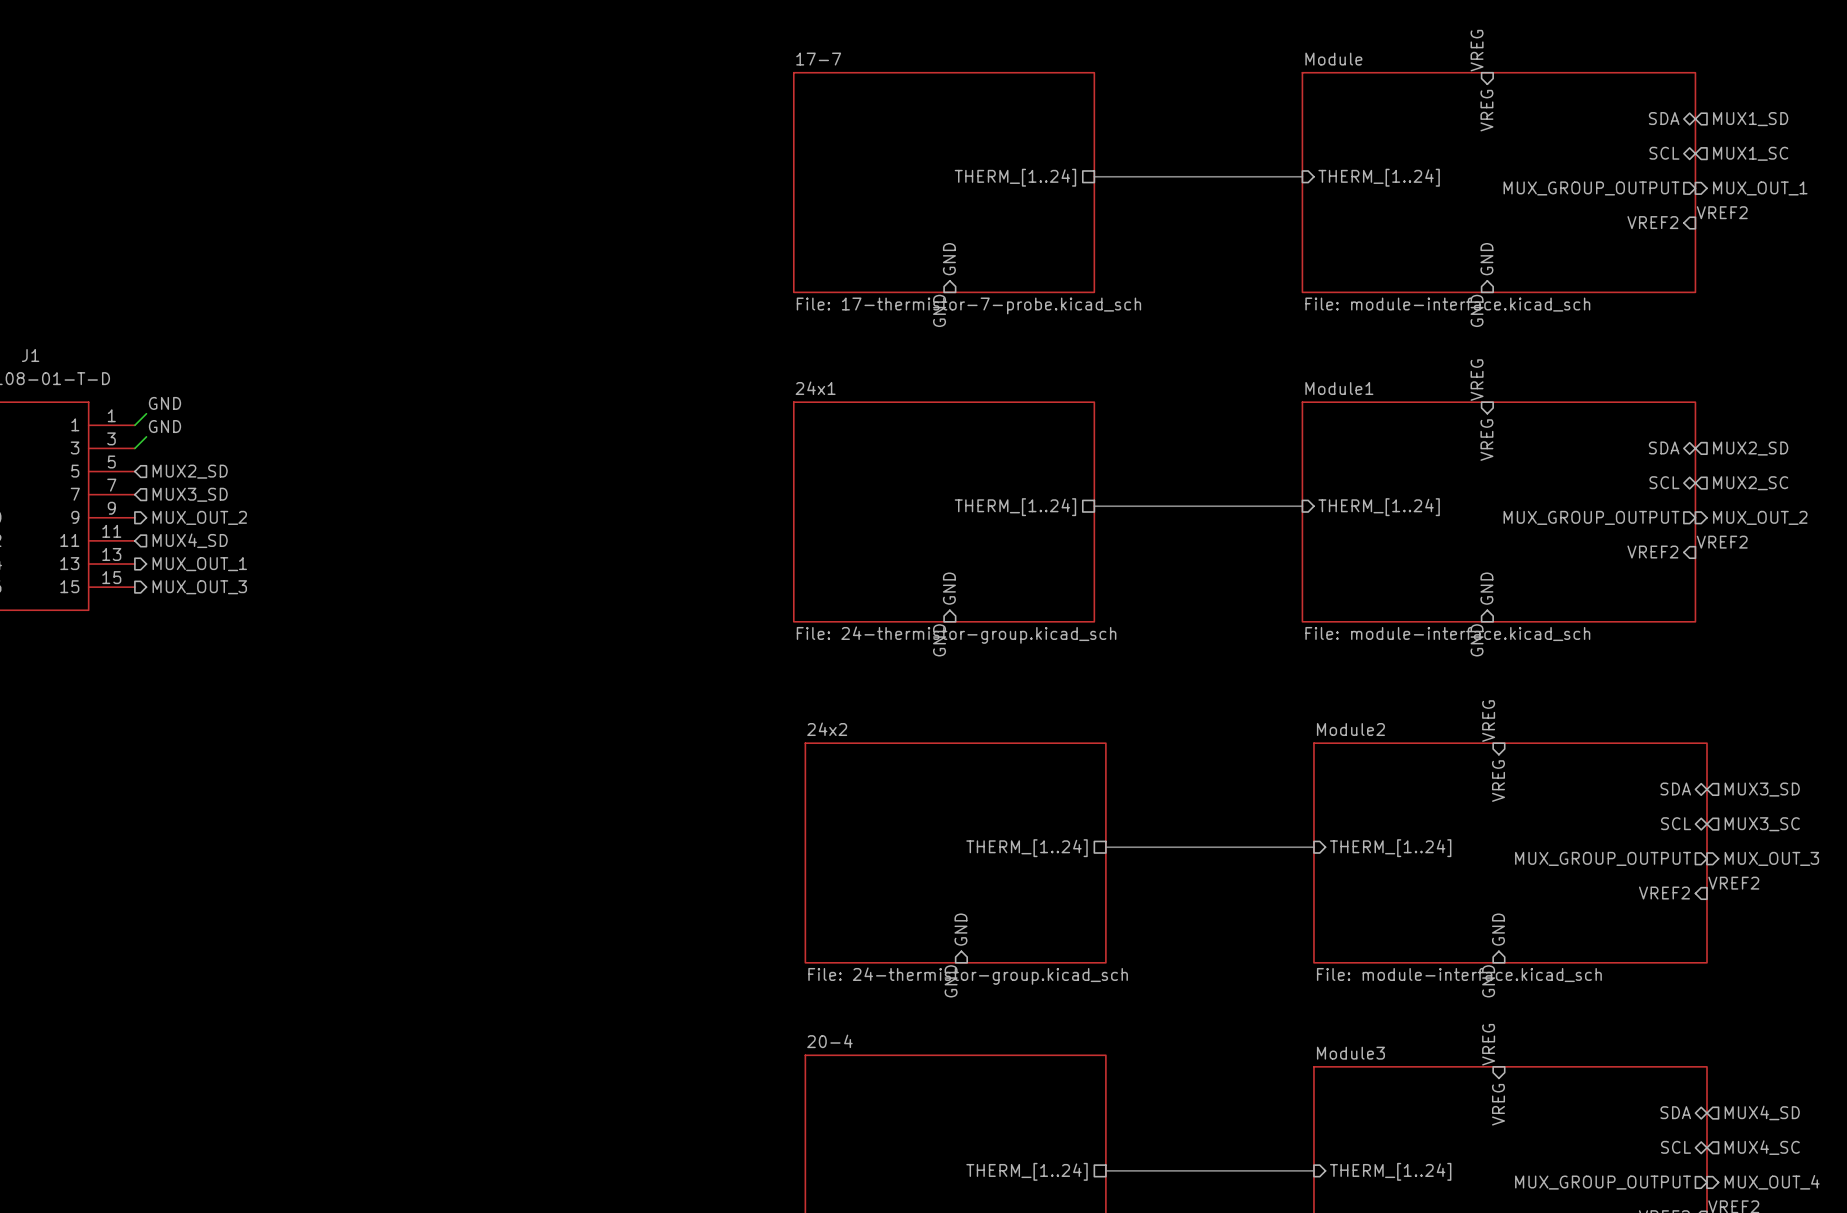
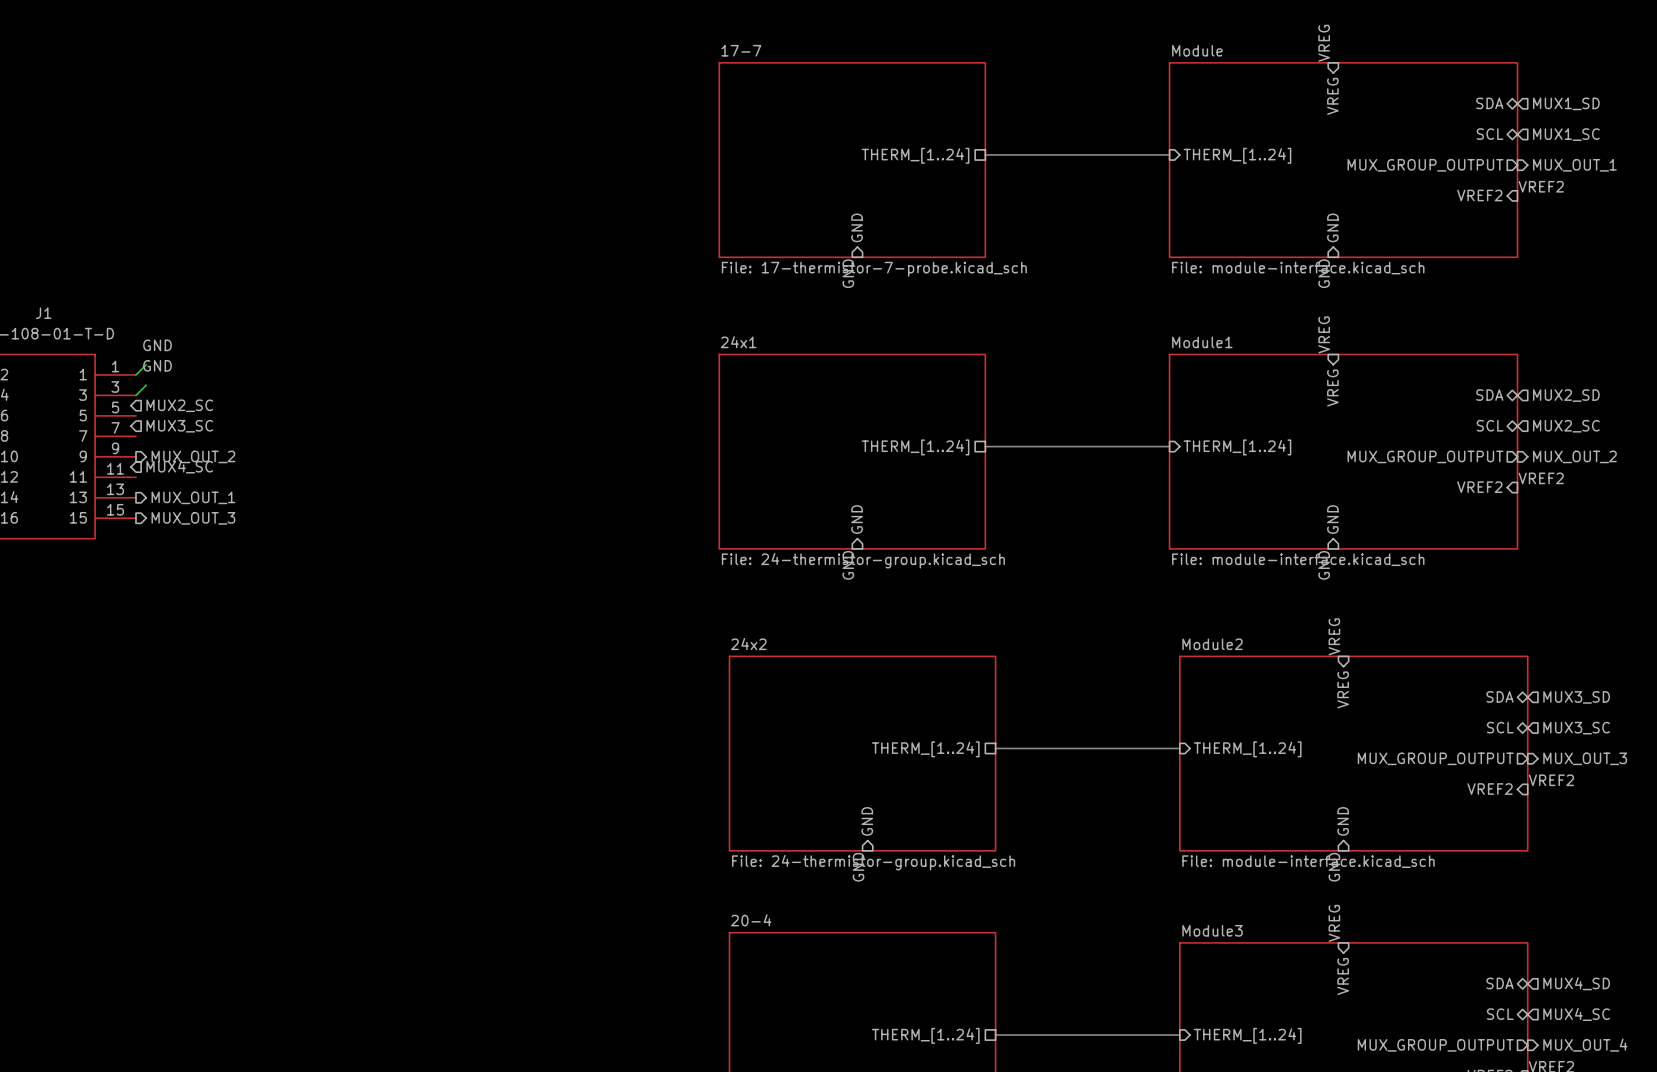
label: none -> GND (157, 345)
label: GND (164, 403) -> none
label: none -> GND (157, 365)
label: GND (164, 426) -> none
hierarchical label: none -> MUX2_SC (179, 405)
hierarchical label: MUX2_SD (190, 471) -> none
hierarchical label: none -> MUX3_SC (179, 426)
hierarchical label: MUX3_SD (190, 494) -> none
hierarchical label: MUX4_SD (190, 540) -> MUX4_SC (179, 466)

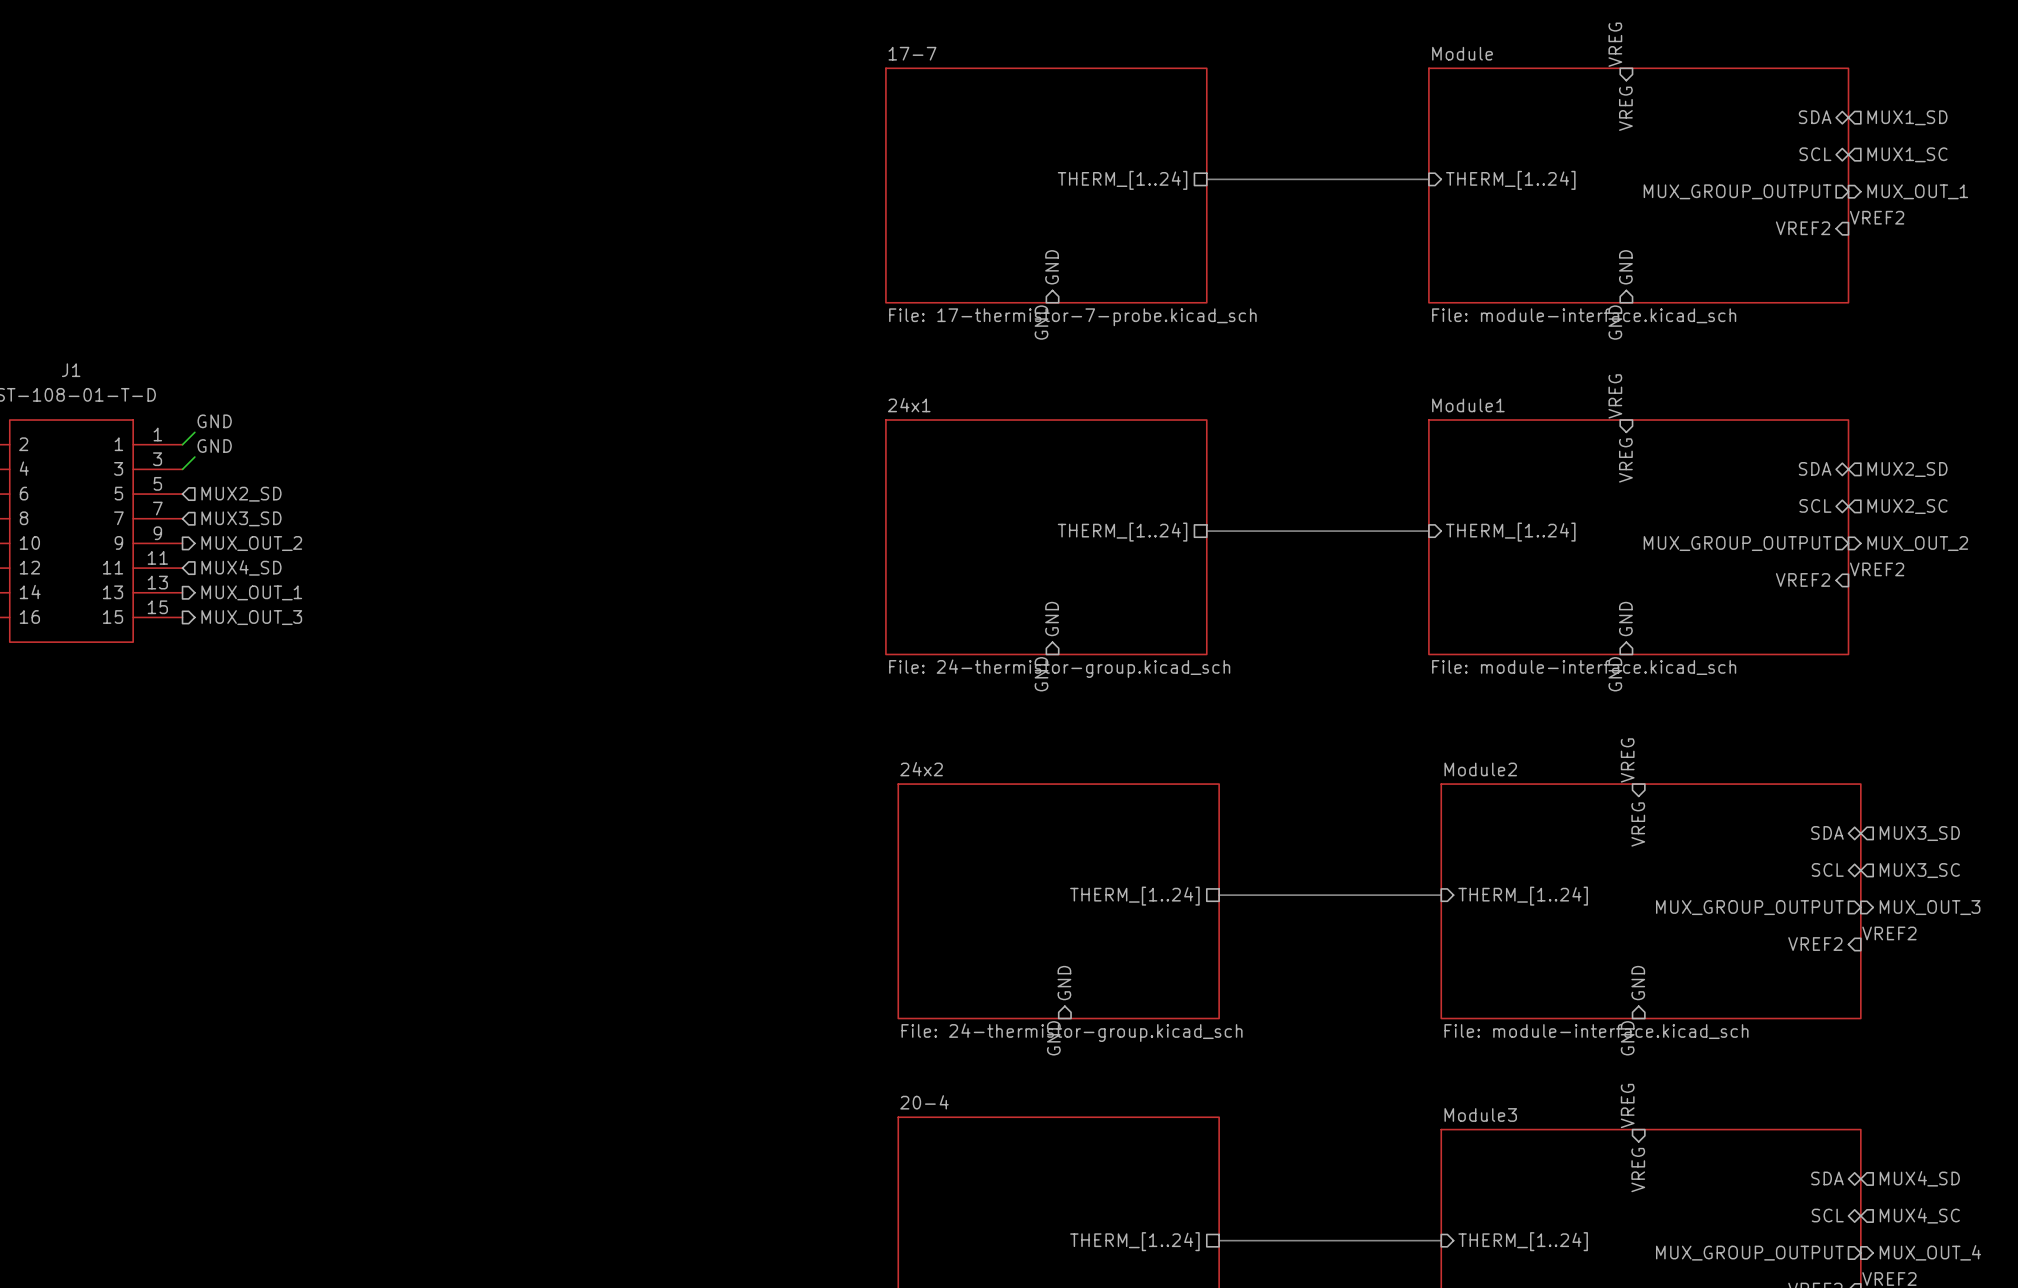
label: GND (157, 345) -> none
label: none -> GND (214, 421)
label: GND (157, 365) -> none
label: none -> GND (214, 446)
hierarchical label: MUX2_SC (179, 405) -> none
hierarchical label: none -> MUX2_SD (241, 494)
hierarchical label: MUX3_SC (179, 426) -> none
hierarchical label: none -> MUX3_SD (241, 518)
hierarchical label: MUX4_SC (179, 466) -> MUX4_SD (241, 567)

